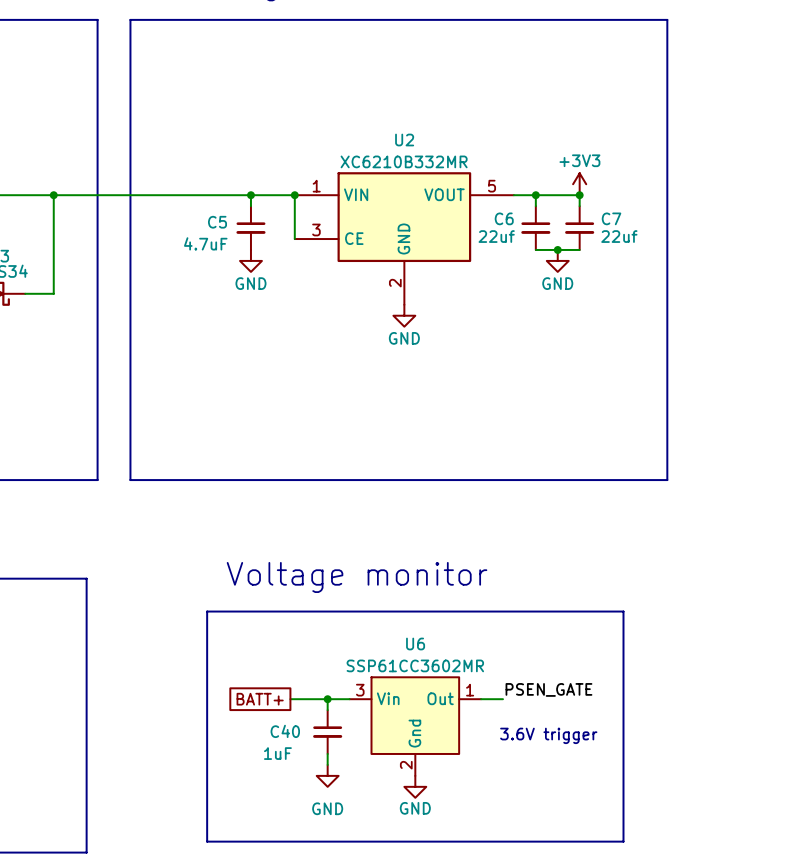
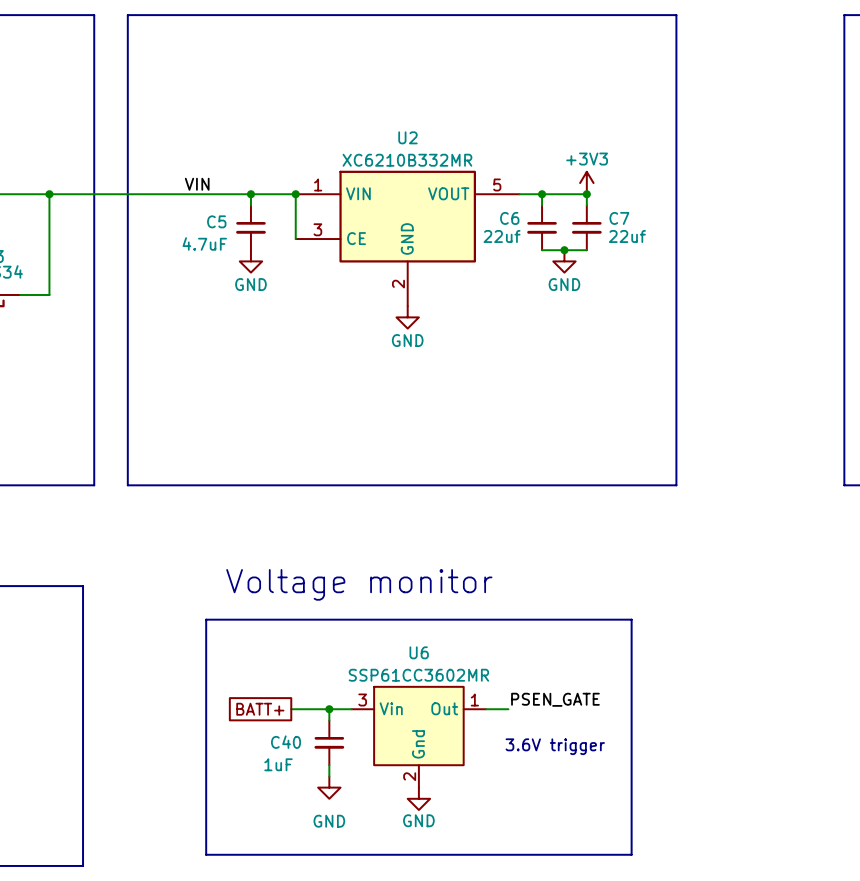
label: none -> VIN (197, 184)

